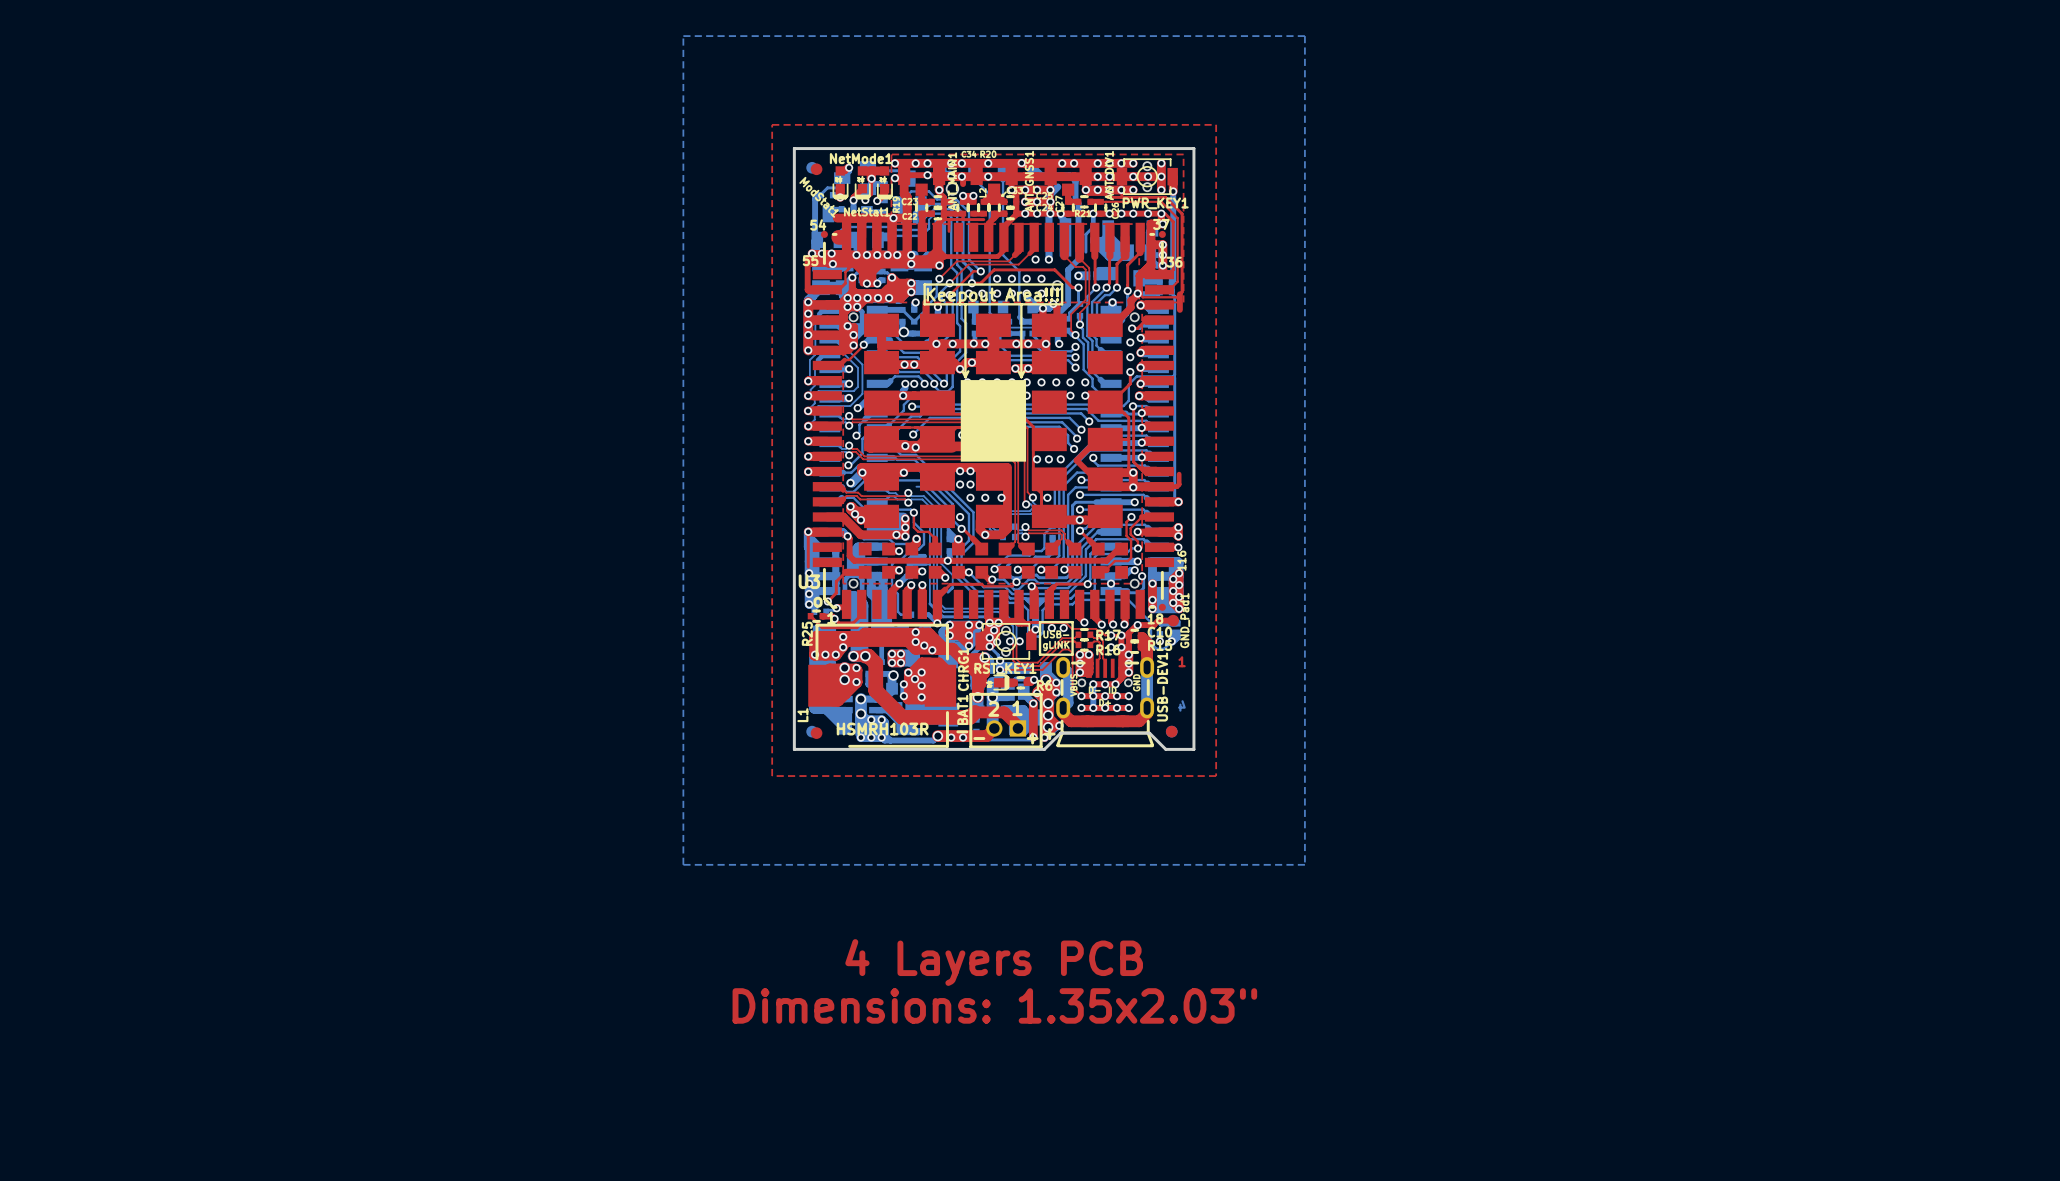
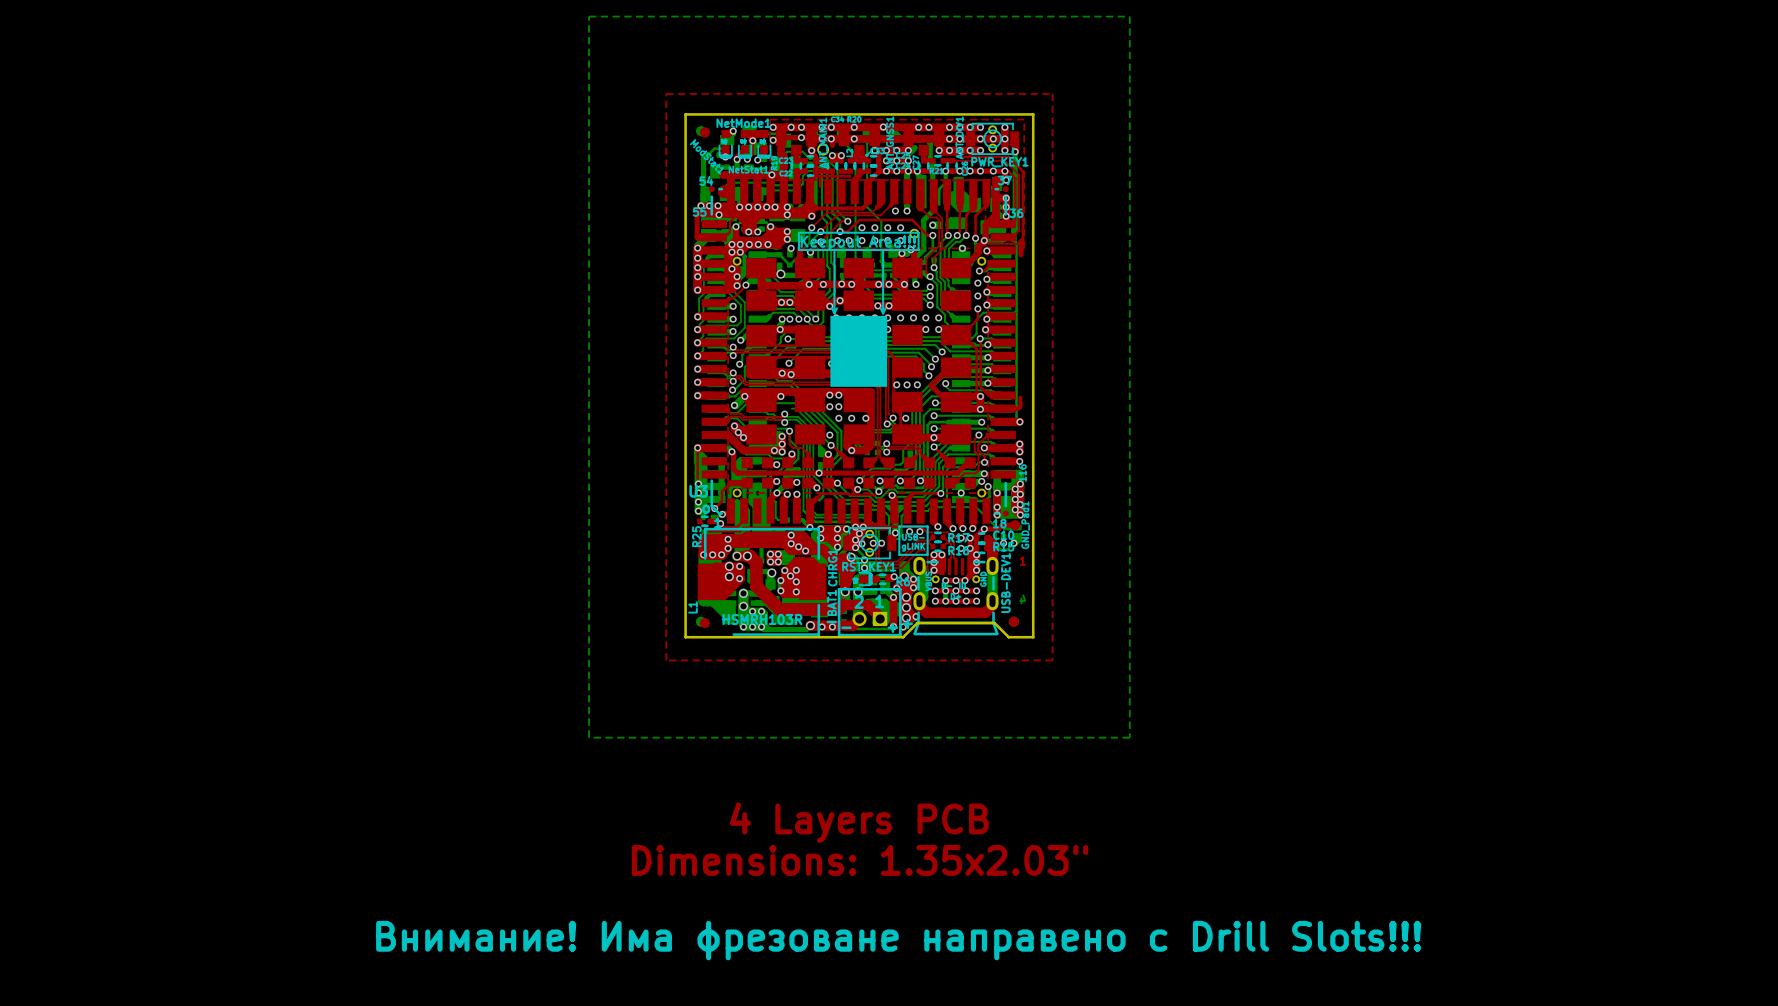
USB-DEV1 text: none -> Внимание! Има фрезоване направено с Drill Slots!!! (898, 940)

